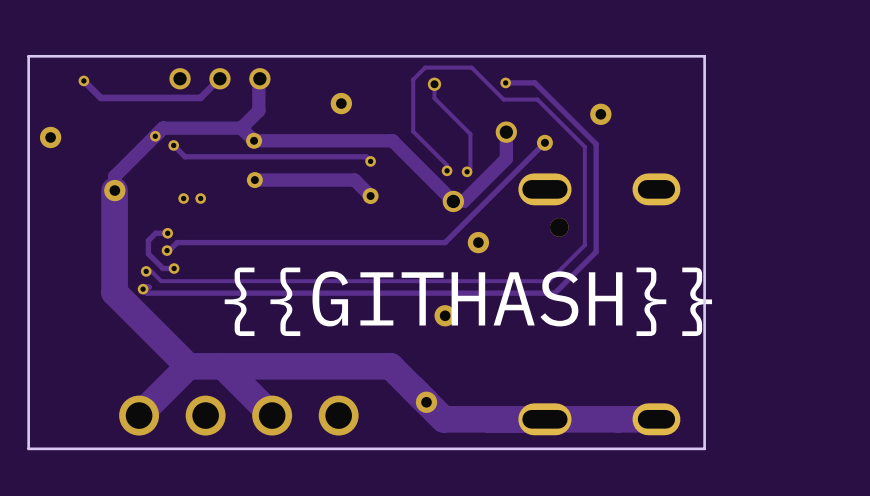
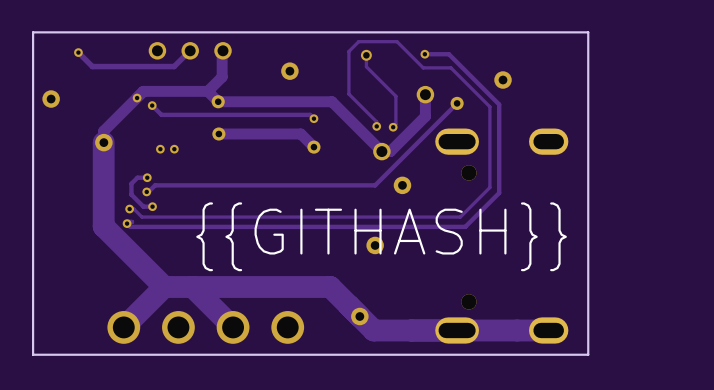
part: none -> (468, 301)

